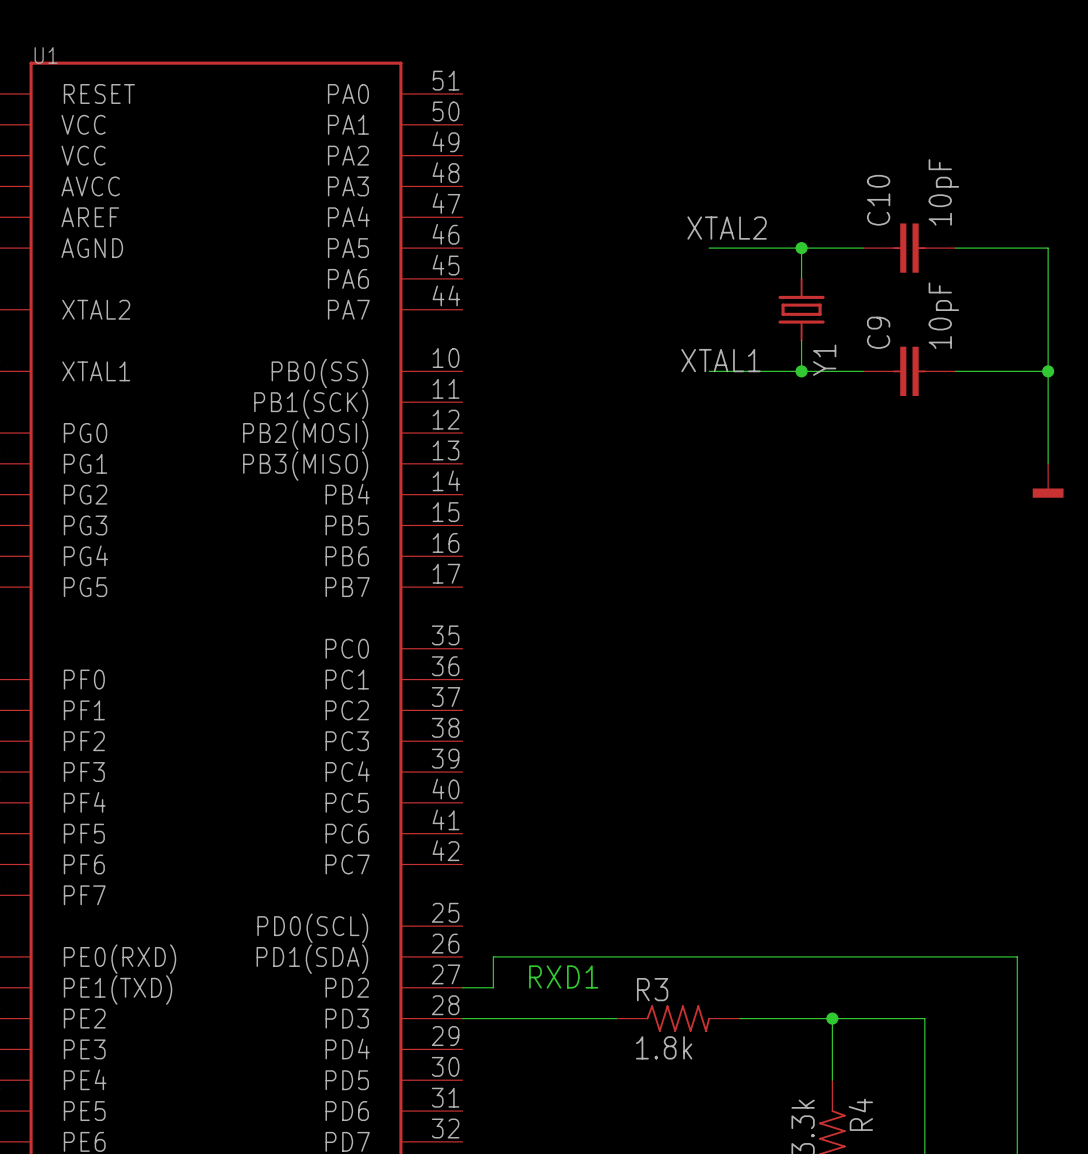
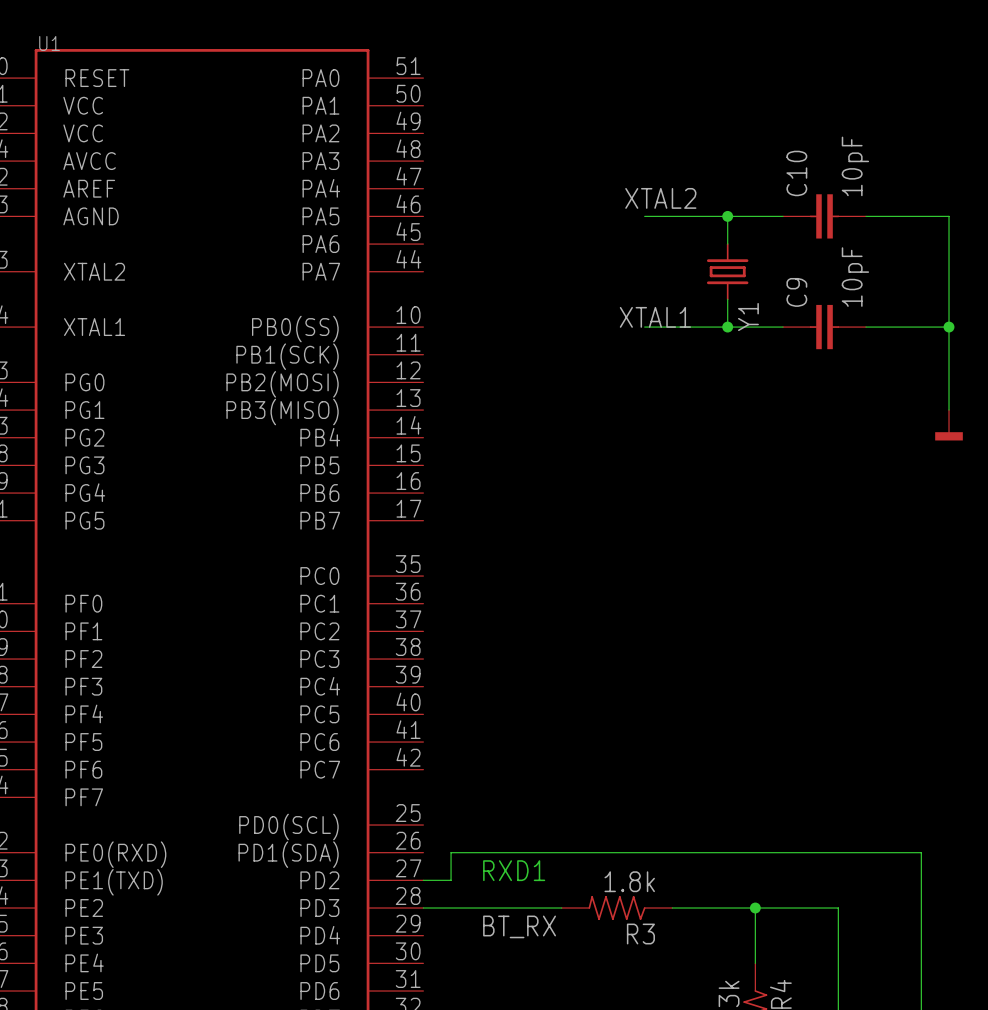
R3 rotation: 0° (678, 1018) -> 180° (617, 908)
label: none -> BT_RX (519, 926)

